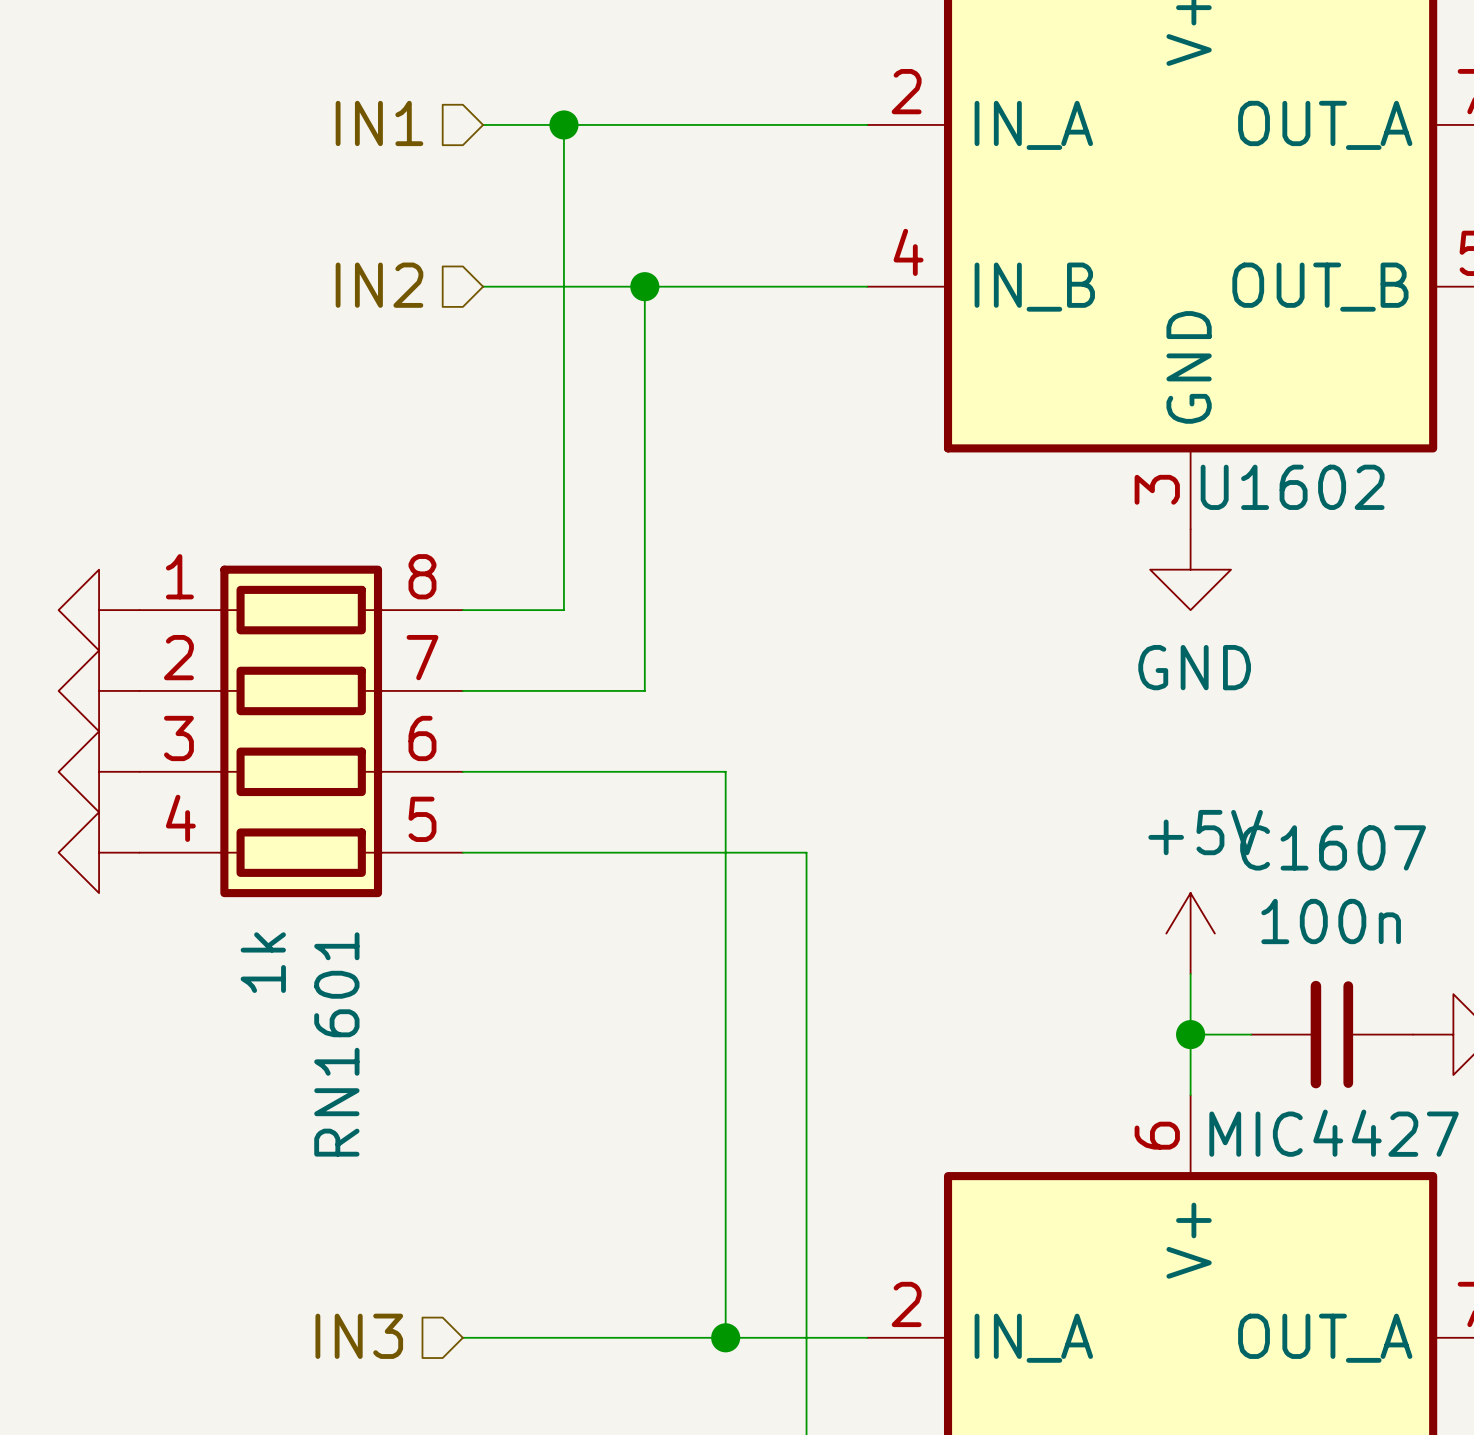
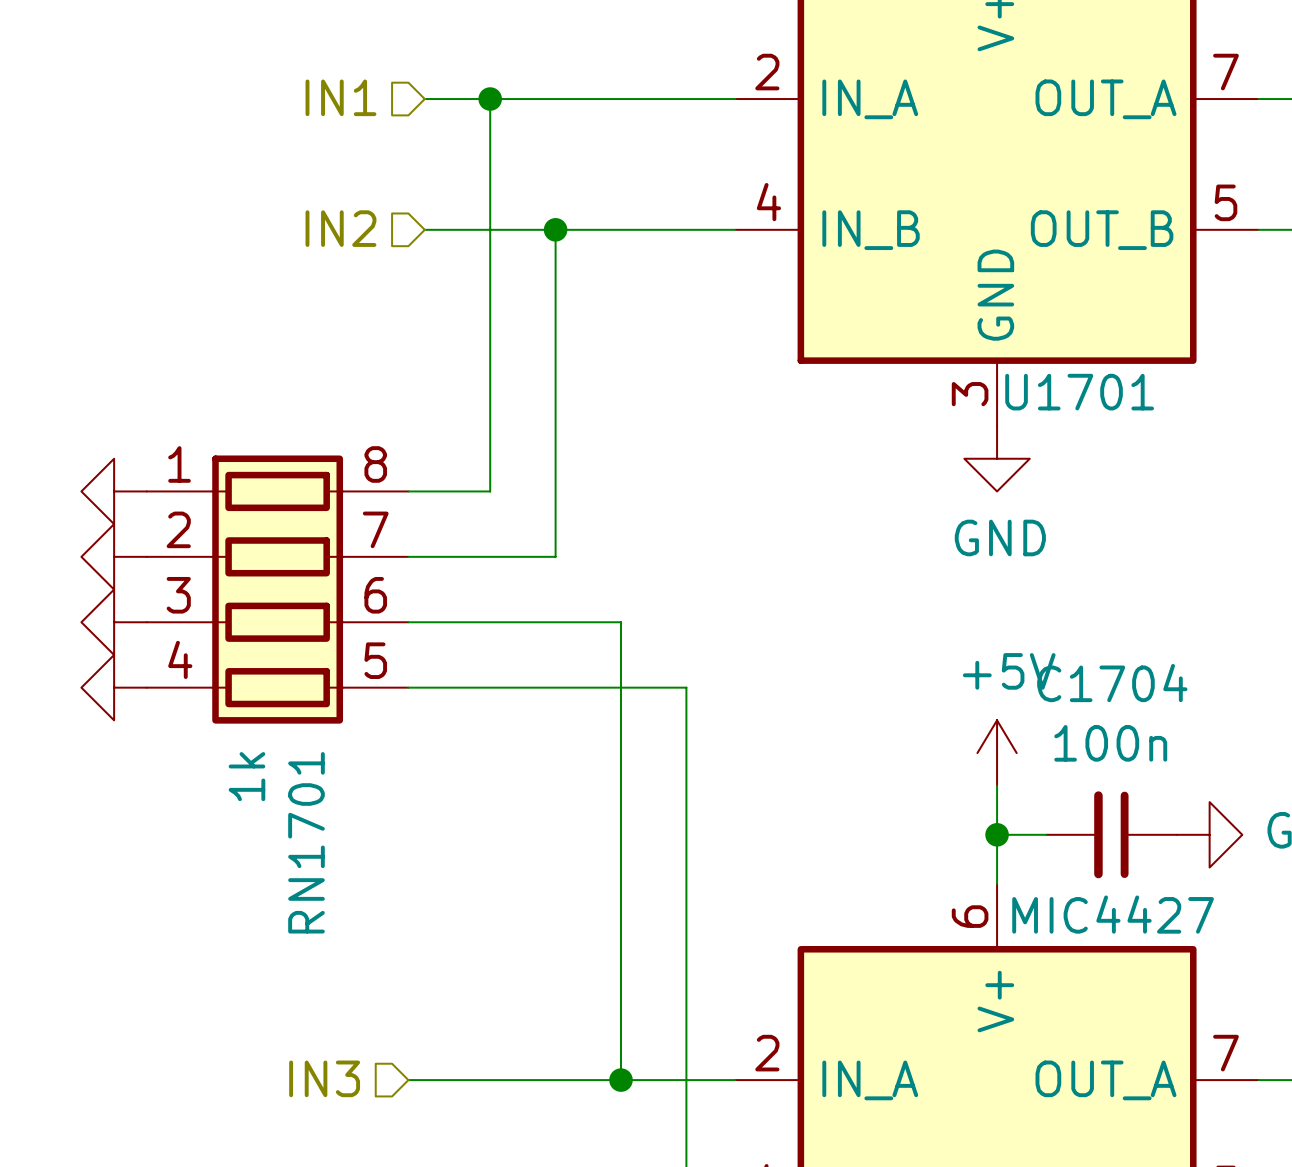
U1602 name: U1602 (1292, 487) -> U1701 (1079, 392)
C1607 name: C1607 (1333, 847) -> C1704 (1112, 683)
RN1601 name: RN1601 (336, 1044) -> RN1701 (306, 842)

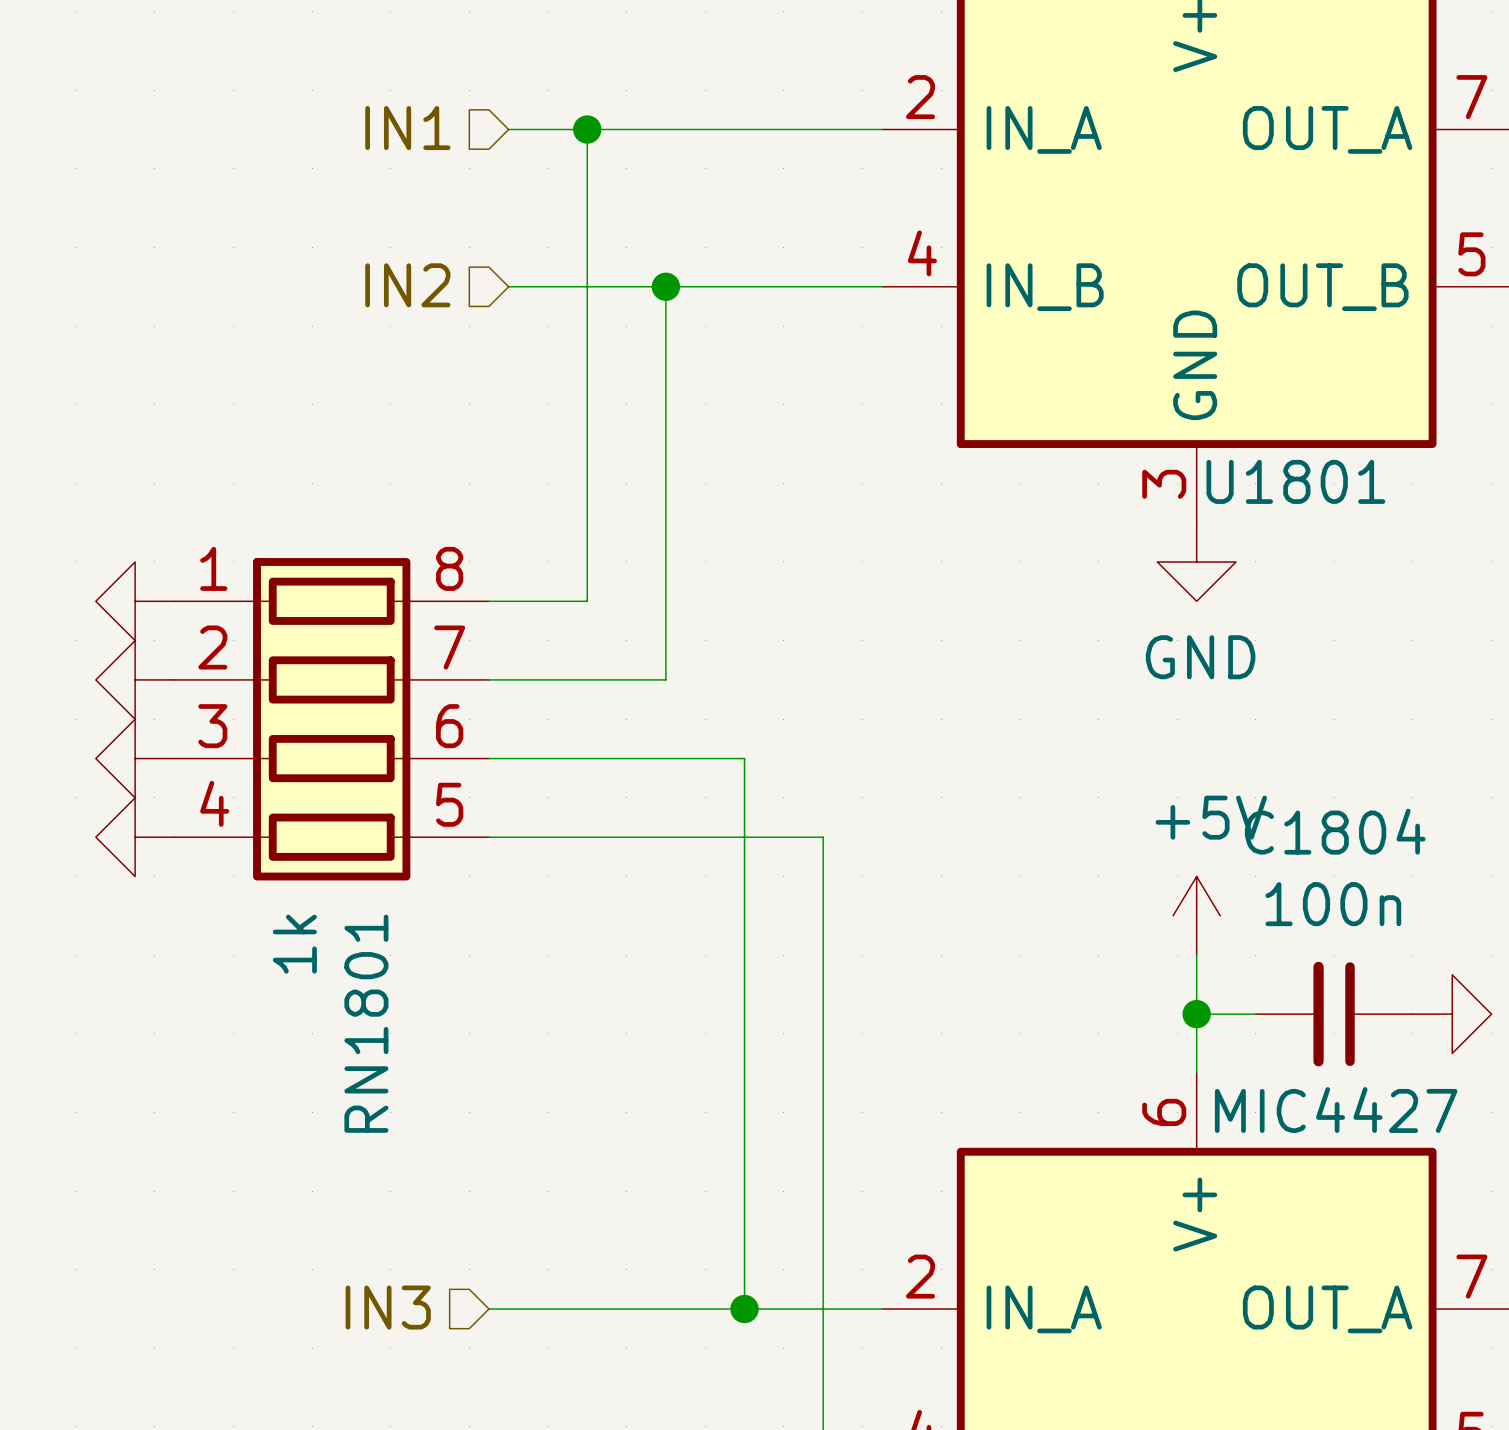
U1701 name: U1701 (1079, 392) -> U1801 (1295, 481)
C1704 name: C1704 (1112, 683) -> C1804 (1335, 831)
RN1701 name: RN1701 (306, 842) -> RN1801 (366, 1023)

